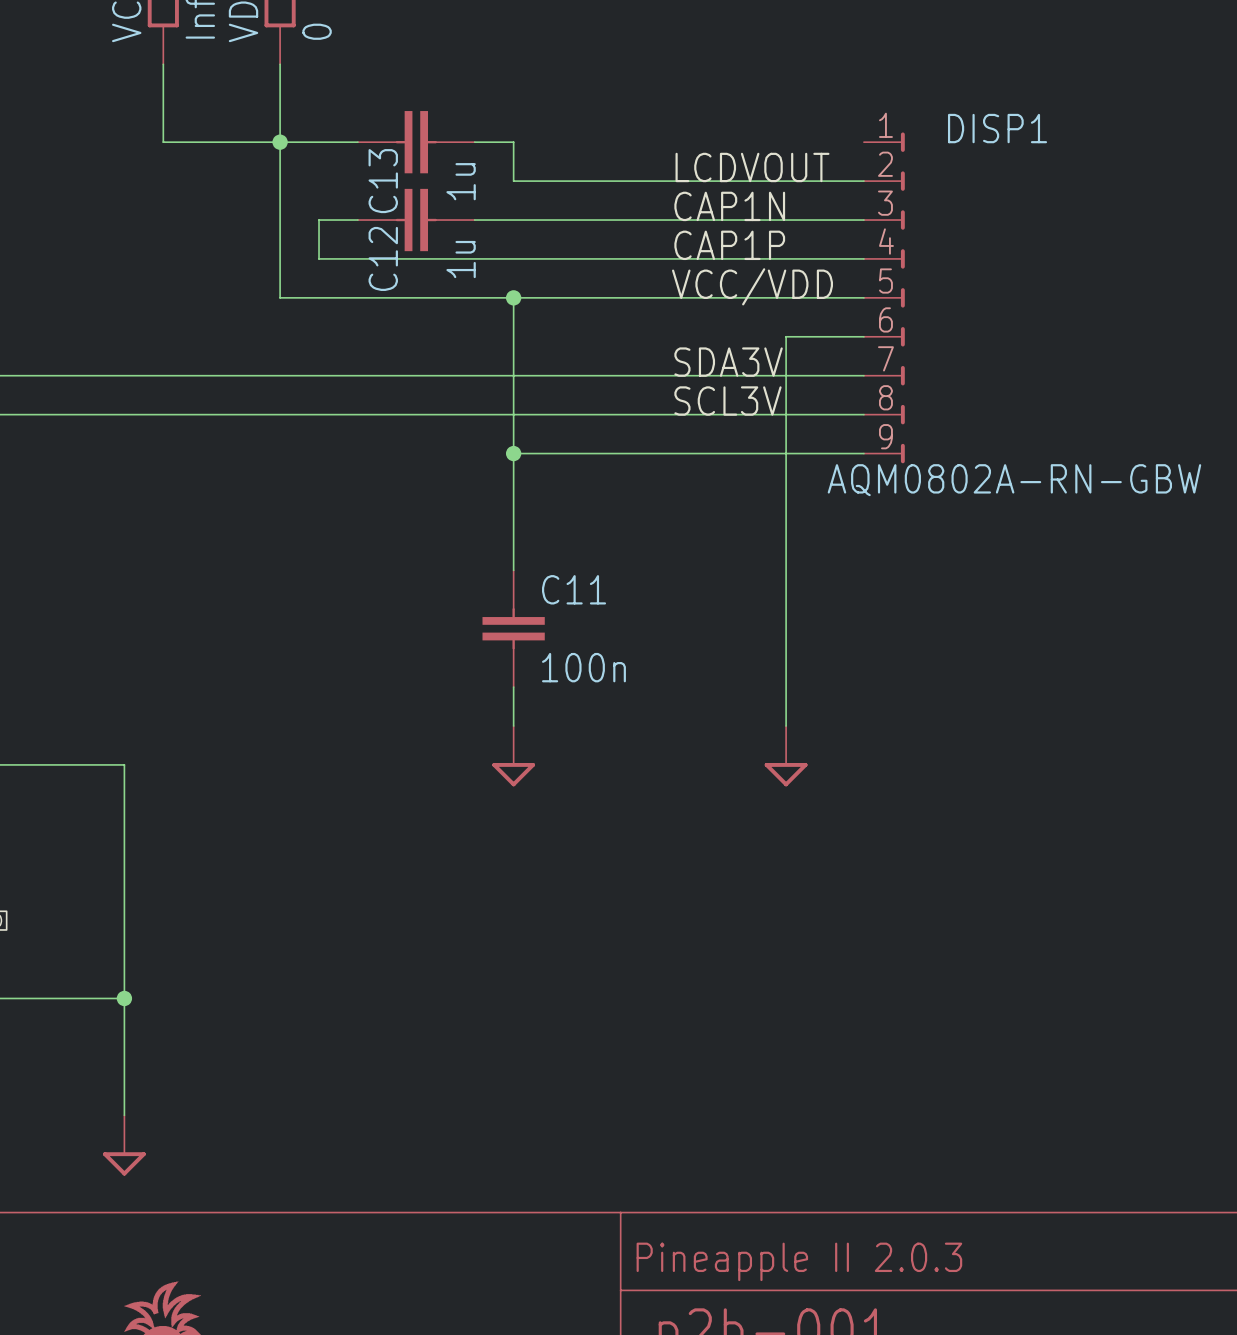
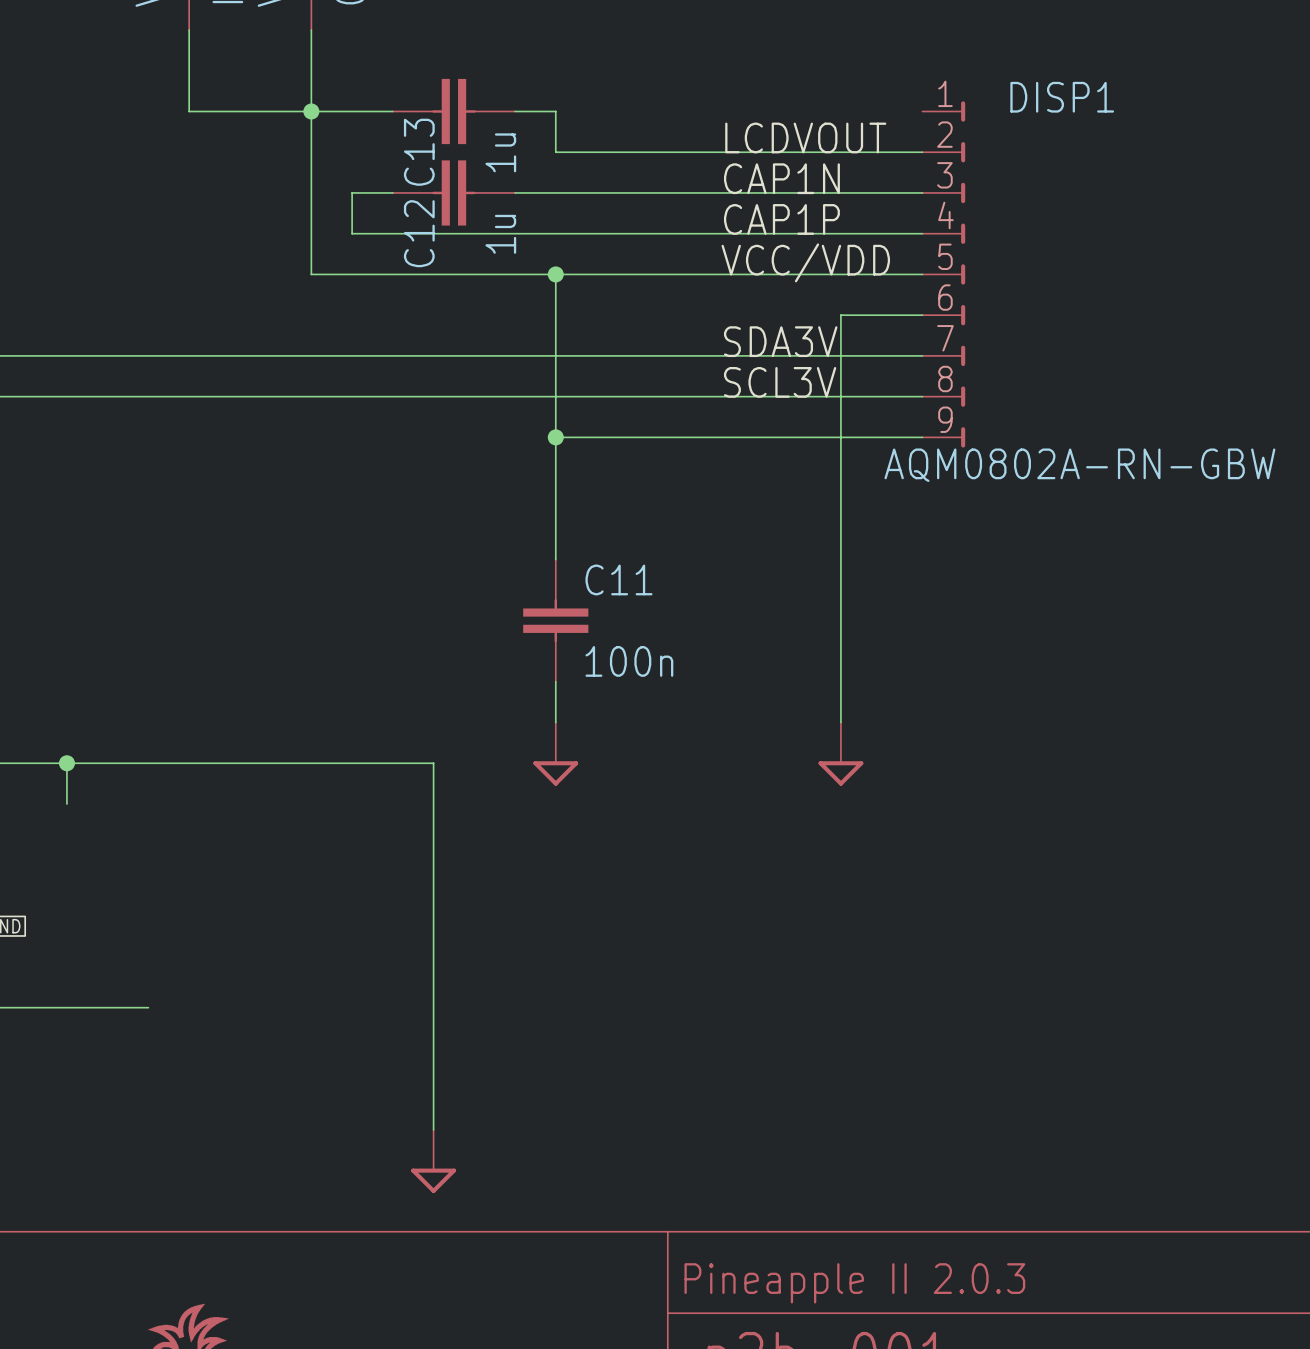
wire: none -> (66, 763) (66, 804)
junction: none -> (66, 763)
wire: (124, 764) (124, 1115) -> (148, 763) (433, 763) (433, 1129)
junction: (124, 998) -> none
power symbol position: (124, 1145) -> (433, 1161)

